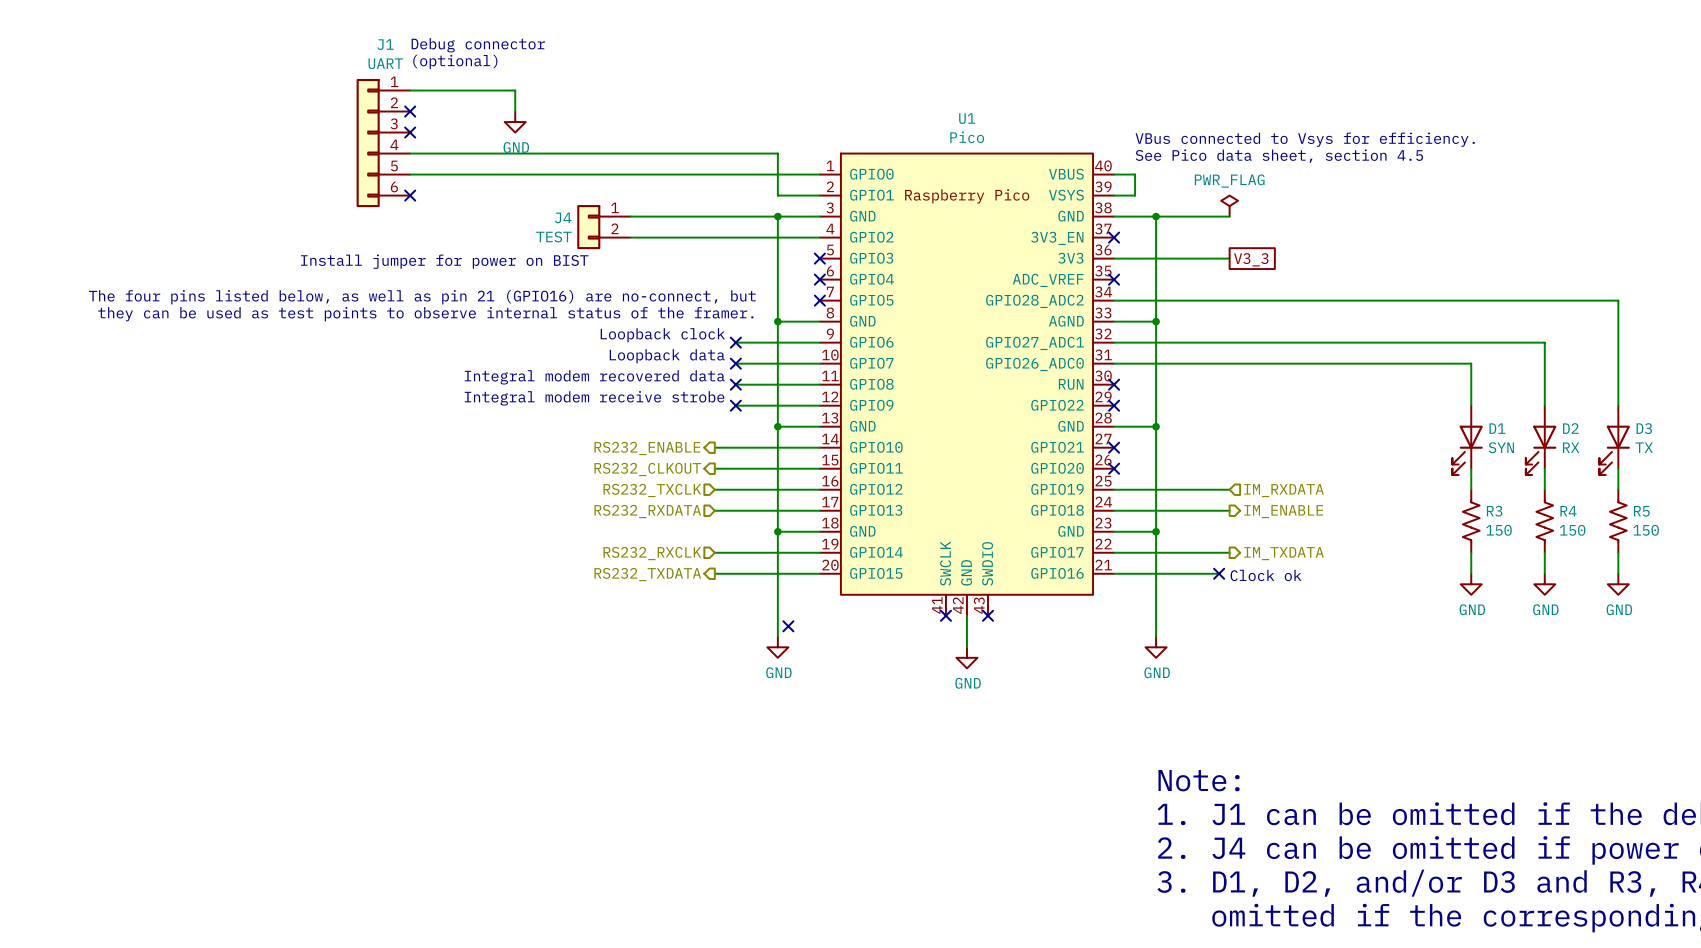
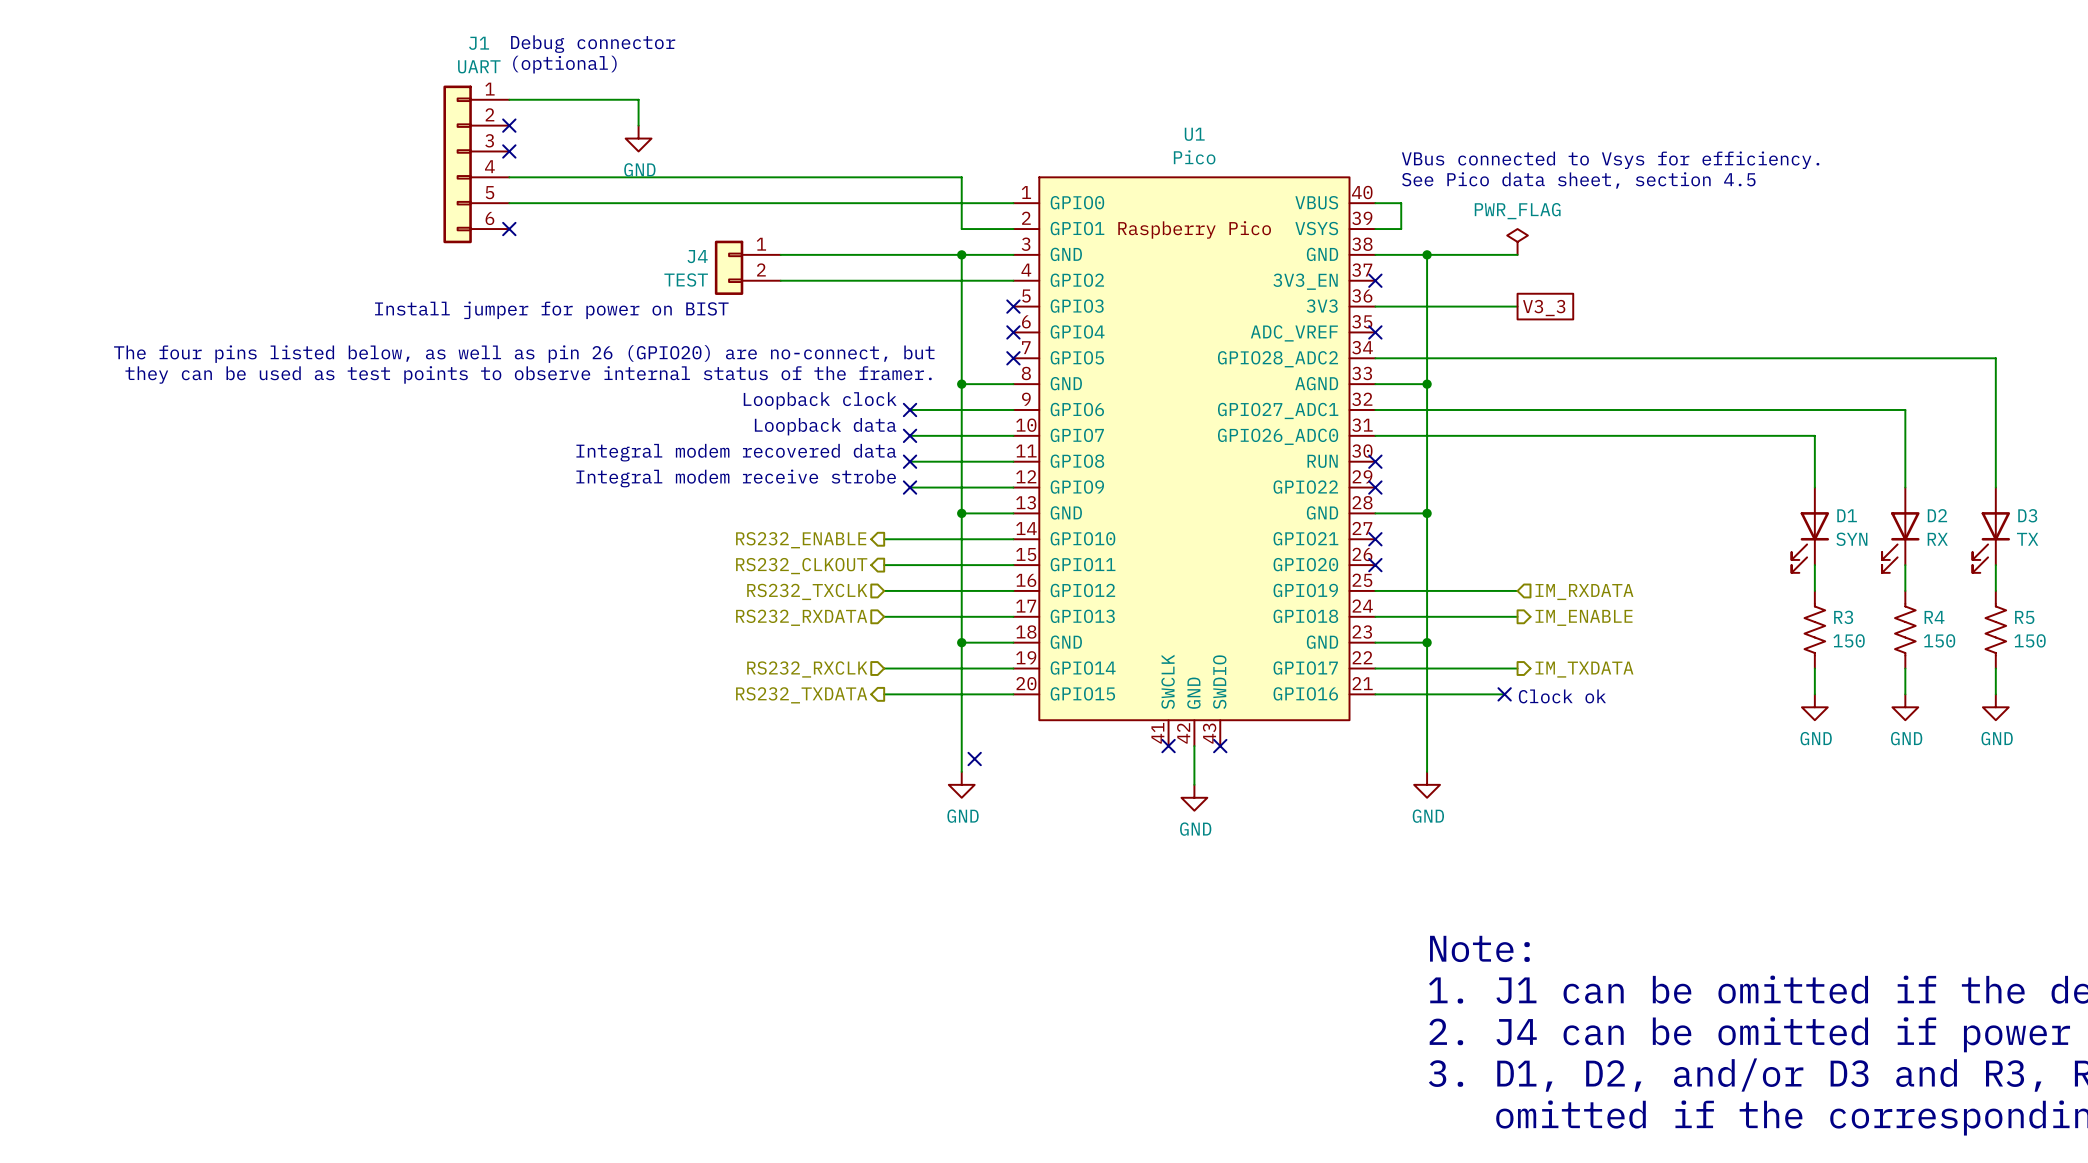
text: The four pins listed below, as well as pin 21 (GPIO16) are no-connect, but (422, 297) -> The four pins listed below, as well as pin 26 (GPIO20) are no-connect, but (524, 354)

